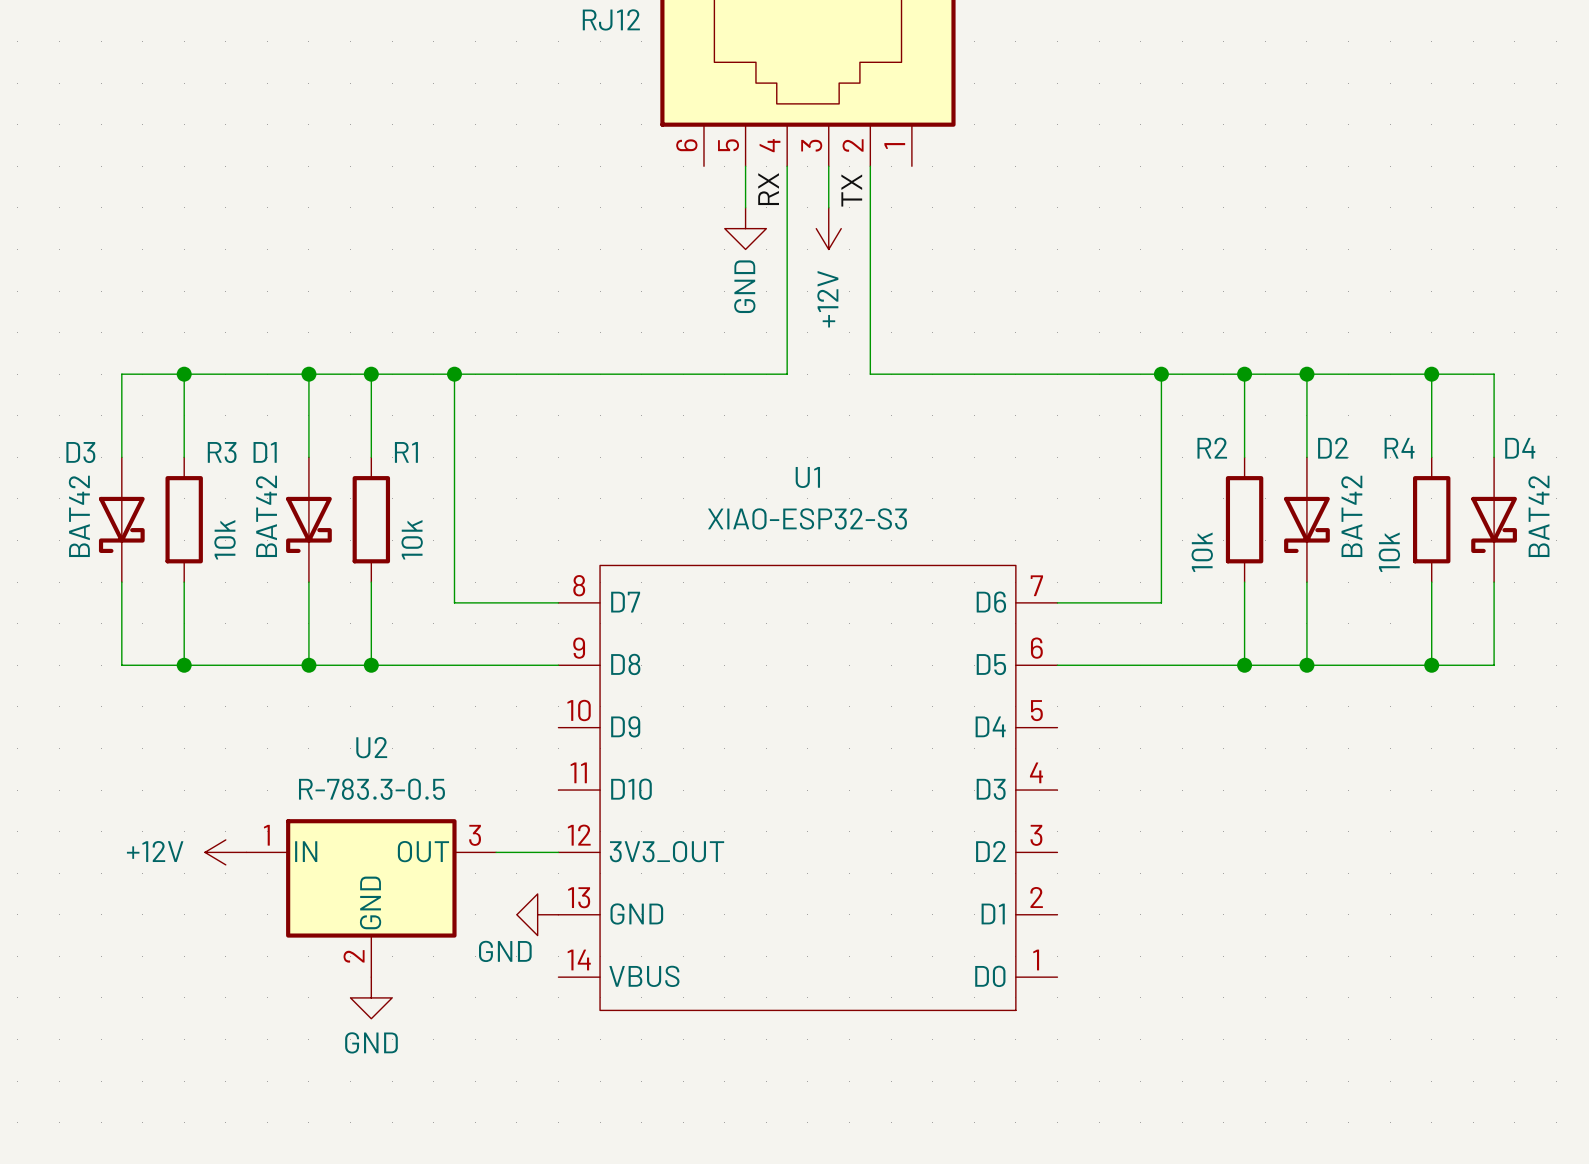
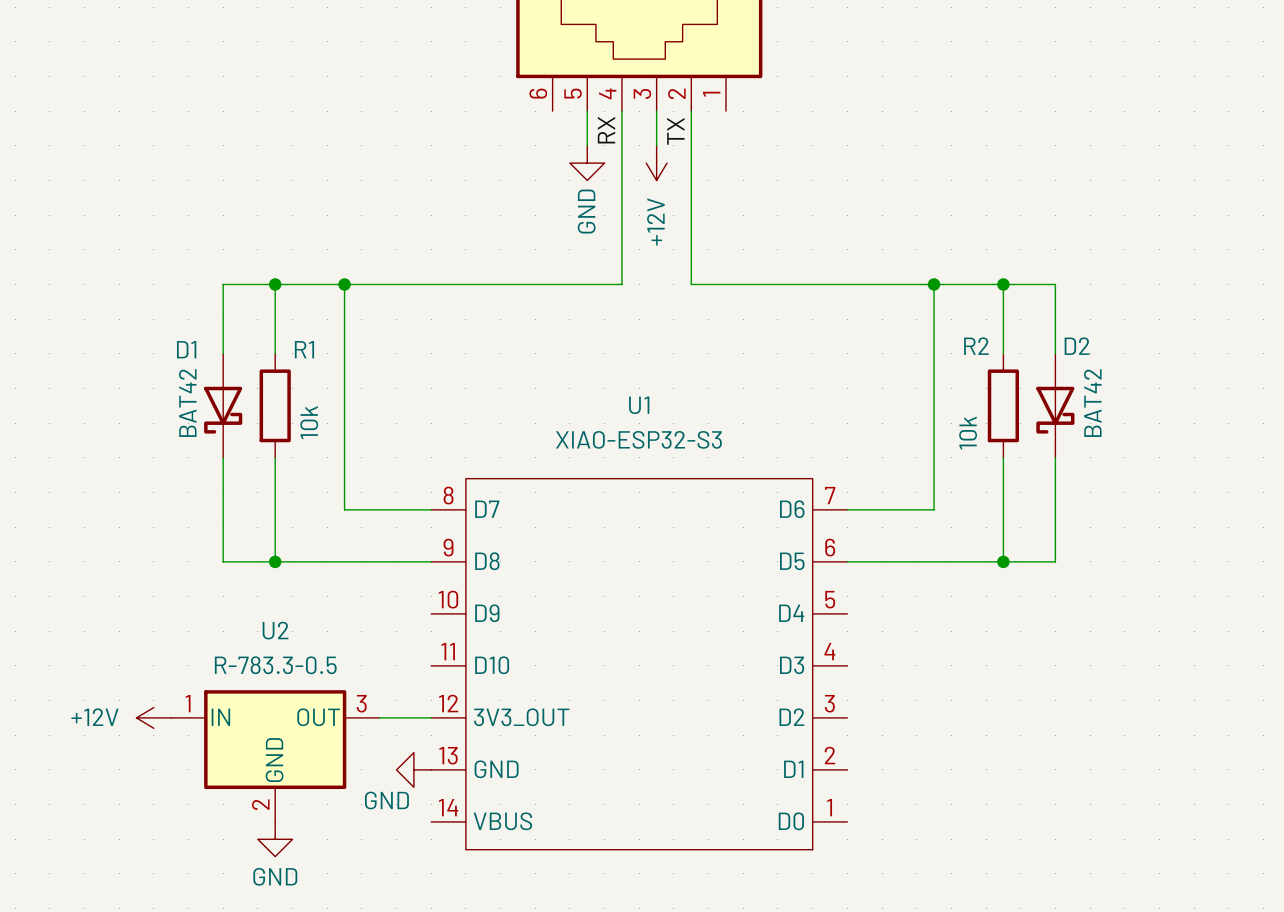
wire: (184, 374) (184, 457) -> none
junction: (184, 374) -> none
wire: (308, 374) (121, 374) (121, 457) -> none
junction: (308, 374) -> none
wire: (1306, 374) (1494, 374) (1494, 457) -> none
junction: (1306, 374) -> none
wire: (1431, 374) (1431, 457) -> none
junction: (1431, 374) -> none
D3: BAT42 (121, 519) -> none
R3: 10k (184, 519) -> none
R4: 10k (1431, 519) -> none
D4: BAT42 (1494, 519) -> none
wire: (121, 582) (121, 665) (558, 665) -> none
wire: (184, 582) (184, 665) -> none
wire: (1431, 582) (1431, 665) -> none
wire: (1494, 582) (1494, 665) (1057, 665) -> none
wire: (454, 602) (558, 602) -> (344, 475) (344, 509) (431, 509)
wire: (1057, 602) (1161, 602) -> (847, 509) (934, 509) (934, 475)
junction: (184, 665) -> none
wire: none -> (223, 527) (223, 561) (431, 561)
junction: (308, 665) -> none
wire: none -> (275, 527) (275, 561)
junction: (371, 665) -> none
wire: none -> (1003, 527) (1003, 561)
junction: (1244, 665) -> none
wire: none -> (1055, 527) (1055, 561) (847, 561)
junction: (1306, 665) -> none
junction: (1431, 665) -> none
junction: none -> (275, 561)
junction: none -> (1003, 561)
U1 position: (807, 787) -> (639, 664)
power symbol position: +12V (225, 852) -> +12V (153, 717)
wire: (496, 852) (558, 852) -> (379, 717) (431, 717)
U2 position: (371, 898) -> (275, 756)
power symbol position: GND (537, 914) -> GND (413, 769)
power symbol position: GND (371, 997) -> GND (275, 839)

